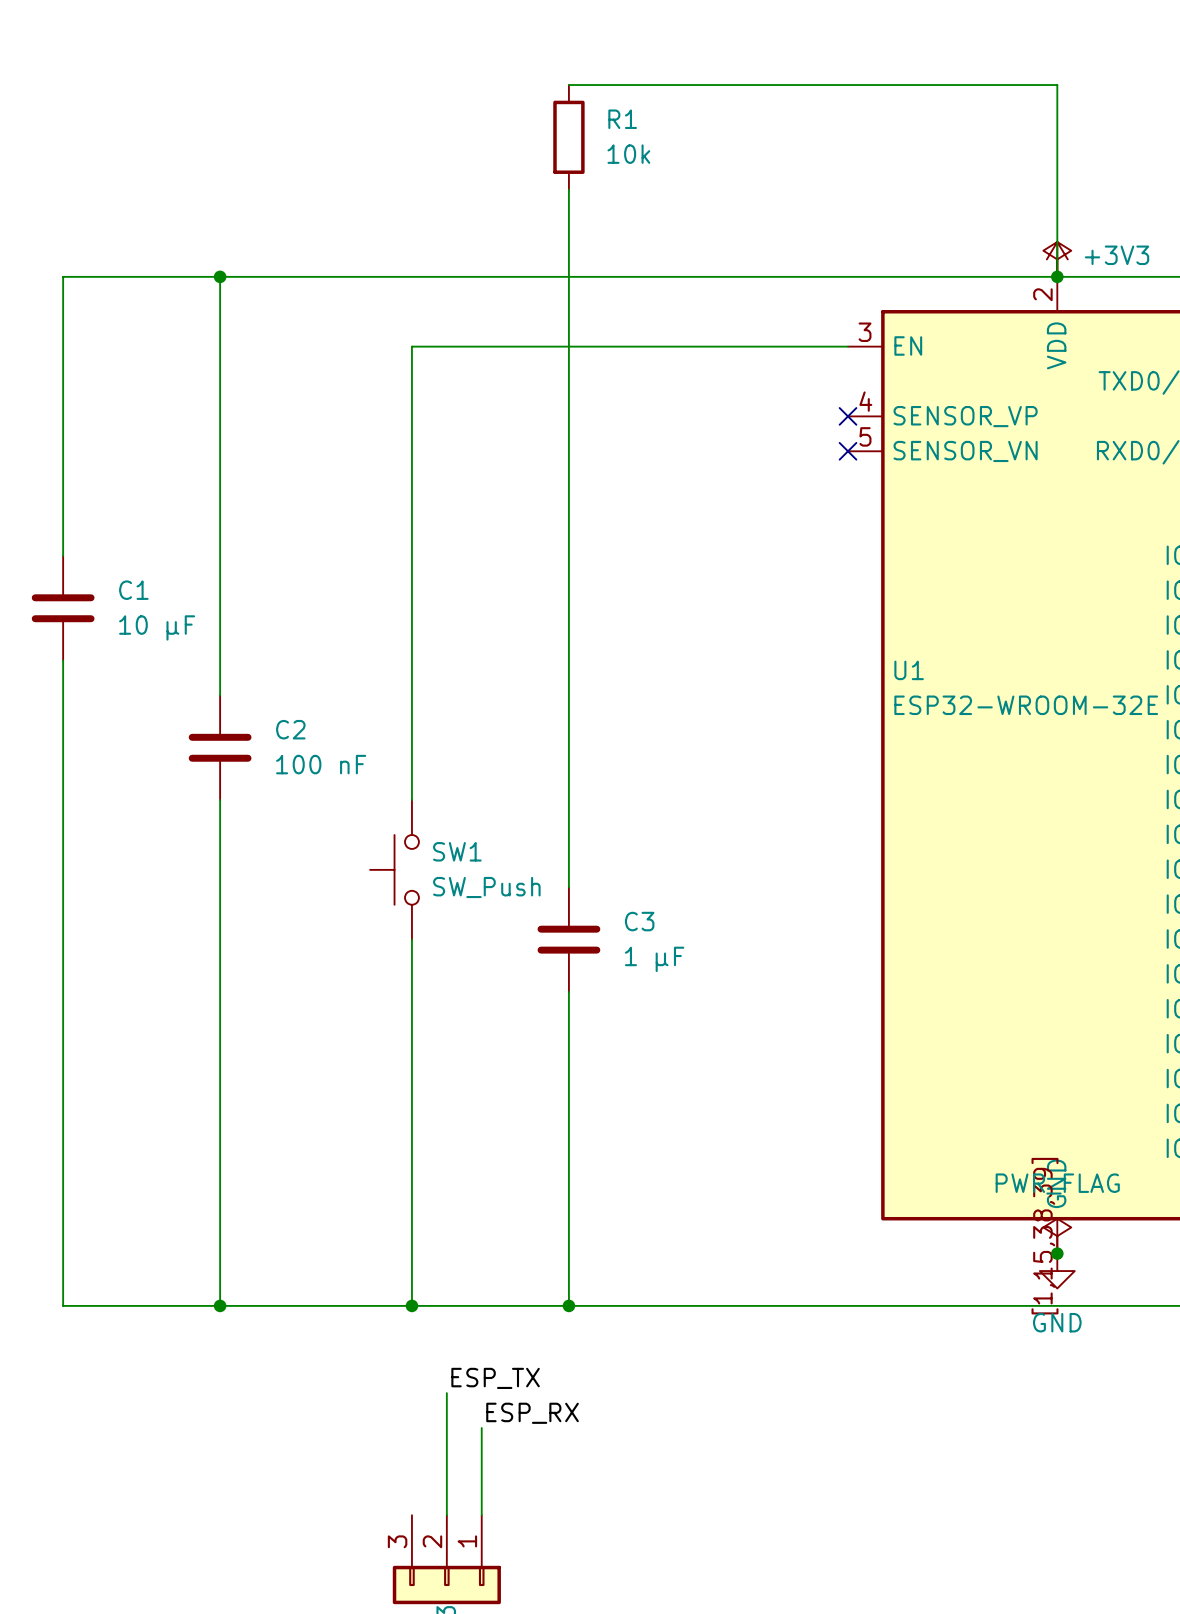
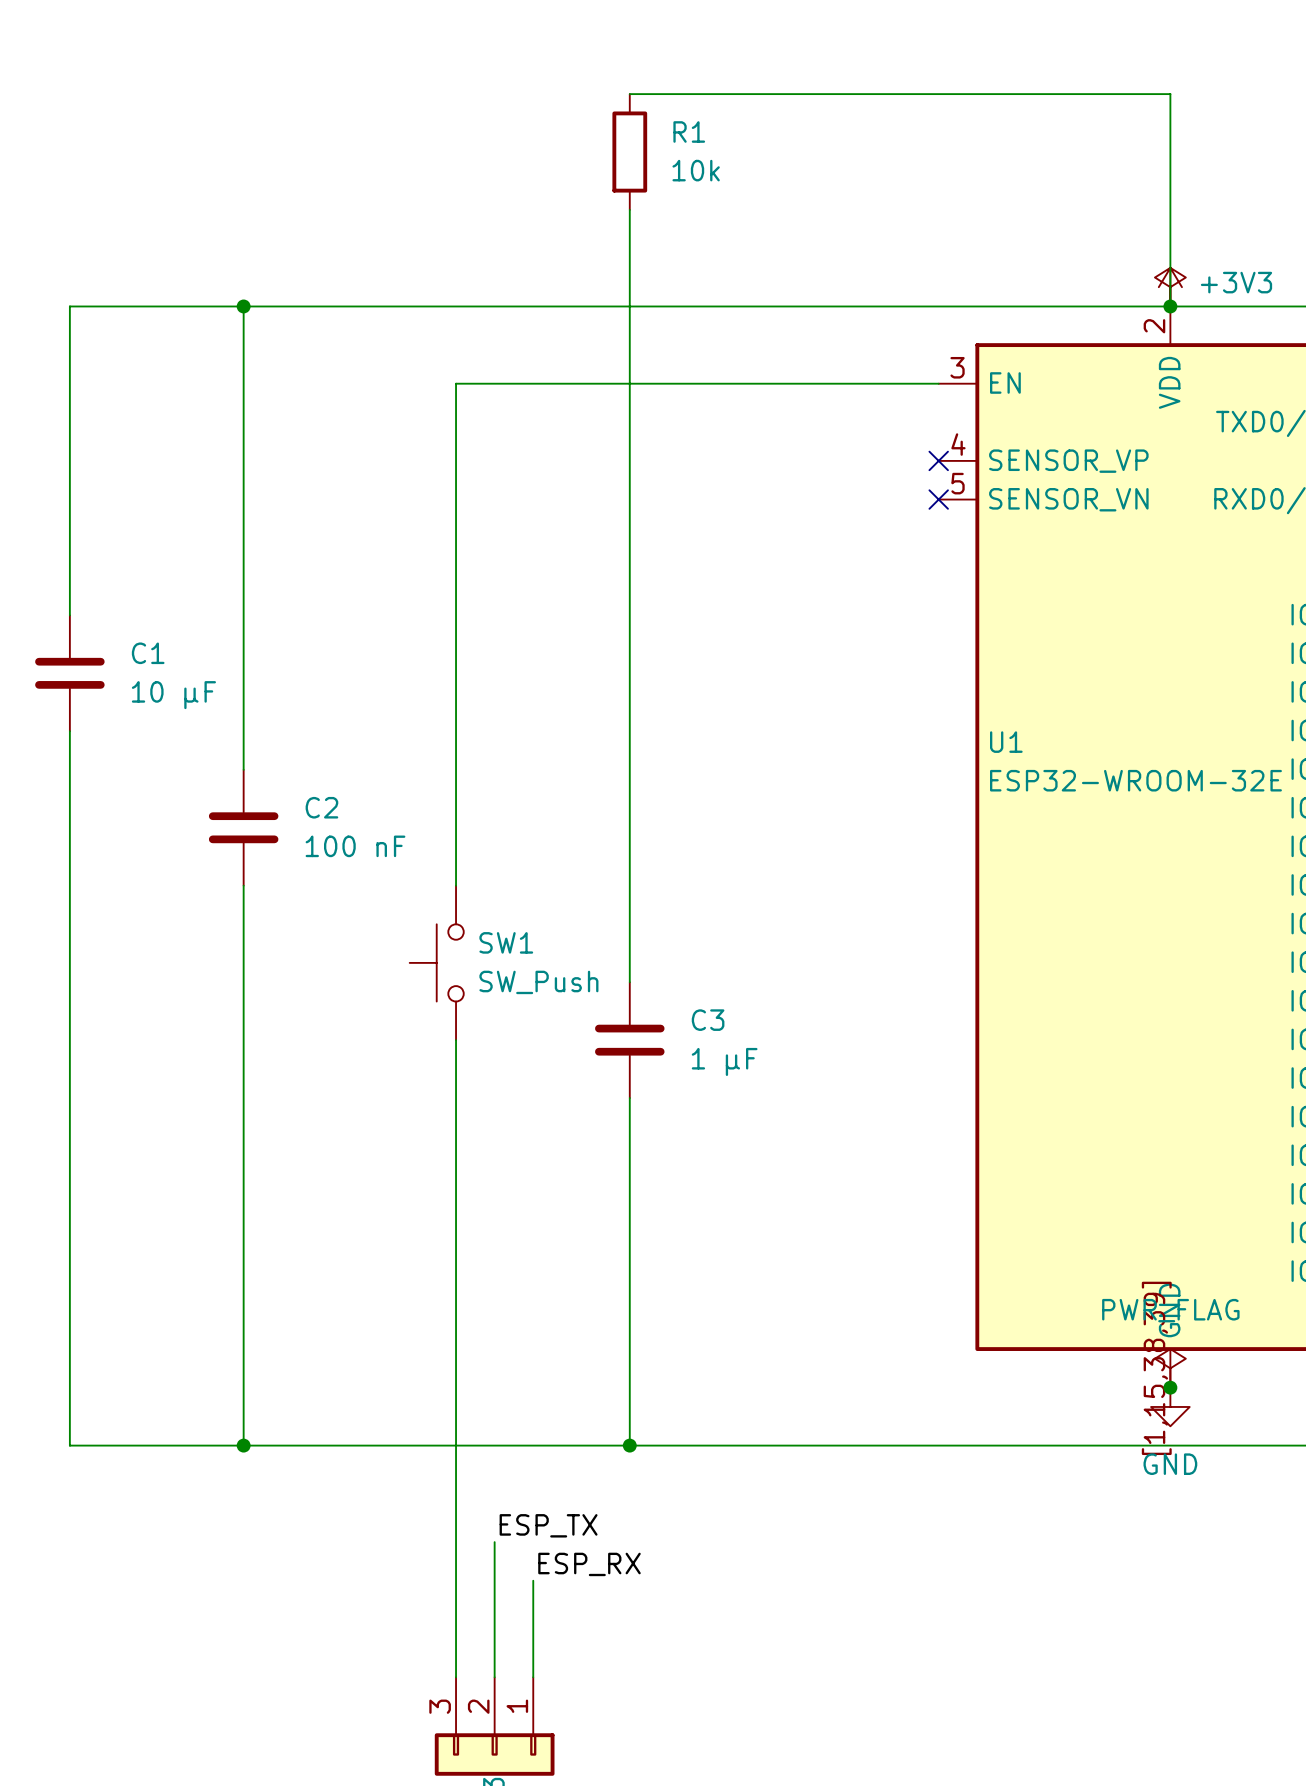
wire: none -> (456, 1445) (456, 1677)
junction: (411, 1305) -> none

